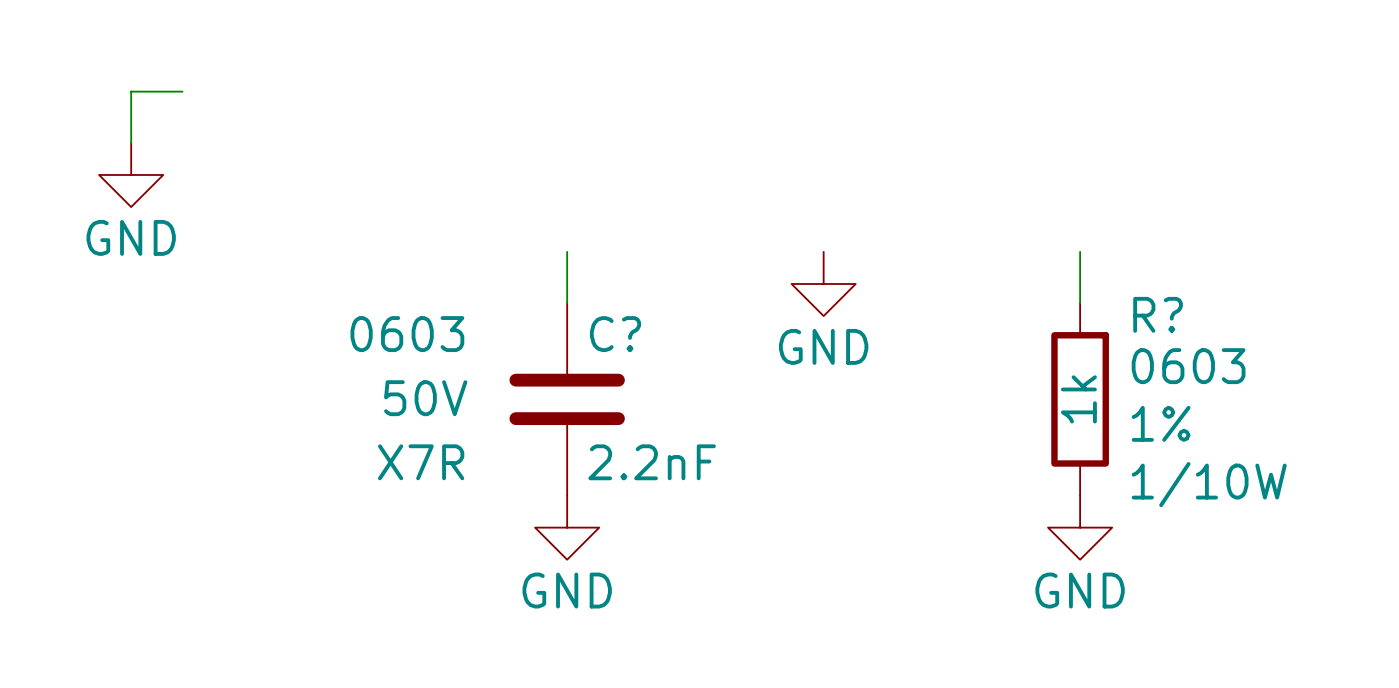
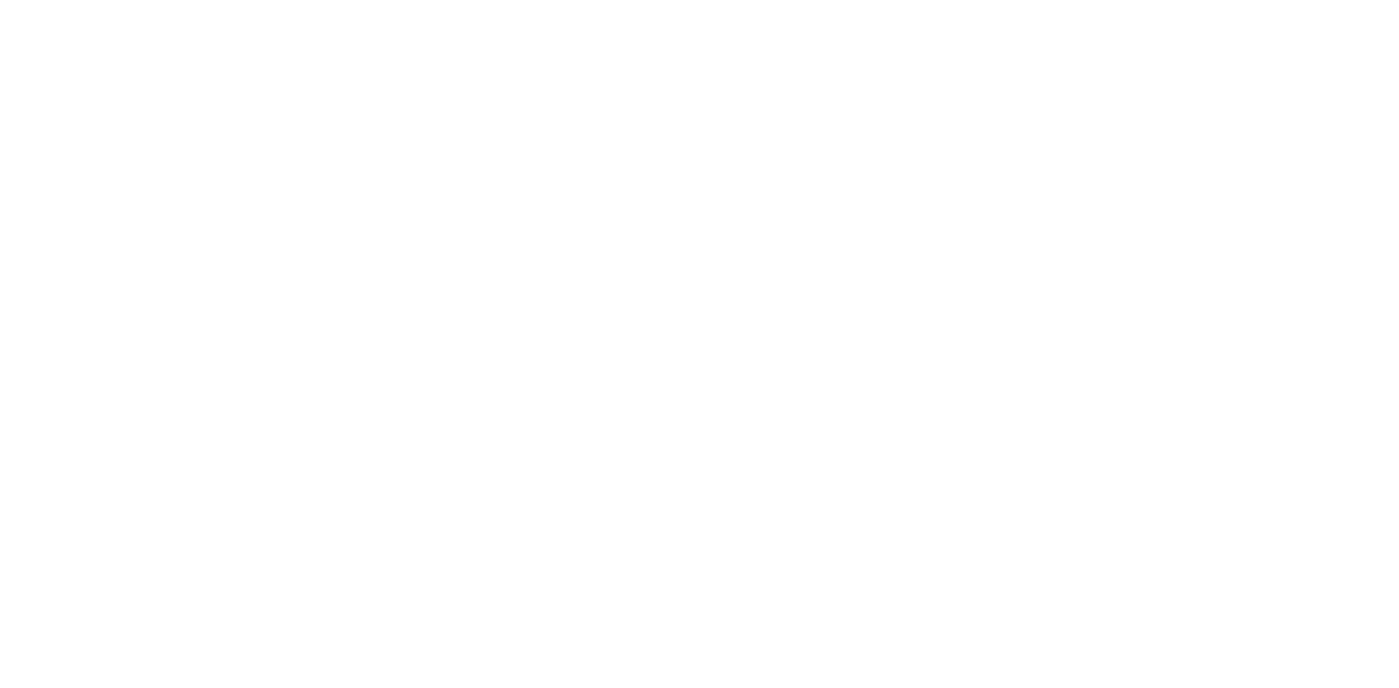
wire: (182, 91) (131, 91) (131, 142) -> none
power symbol: GND (131, 174) -> none
wire: (567, 251) (567, 303) -> none
wire: (1080, 251) (1080, 303) -> none
power symbol: GND (823, 283) -> none
C?: 2.2nF (567, 399) -> none
R?: 1k (1080, 399) -> none
power symbol: GND (567, 527) -> none
power symbol: GND (1080, 527) -> none

